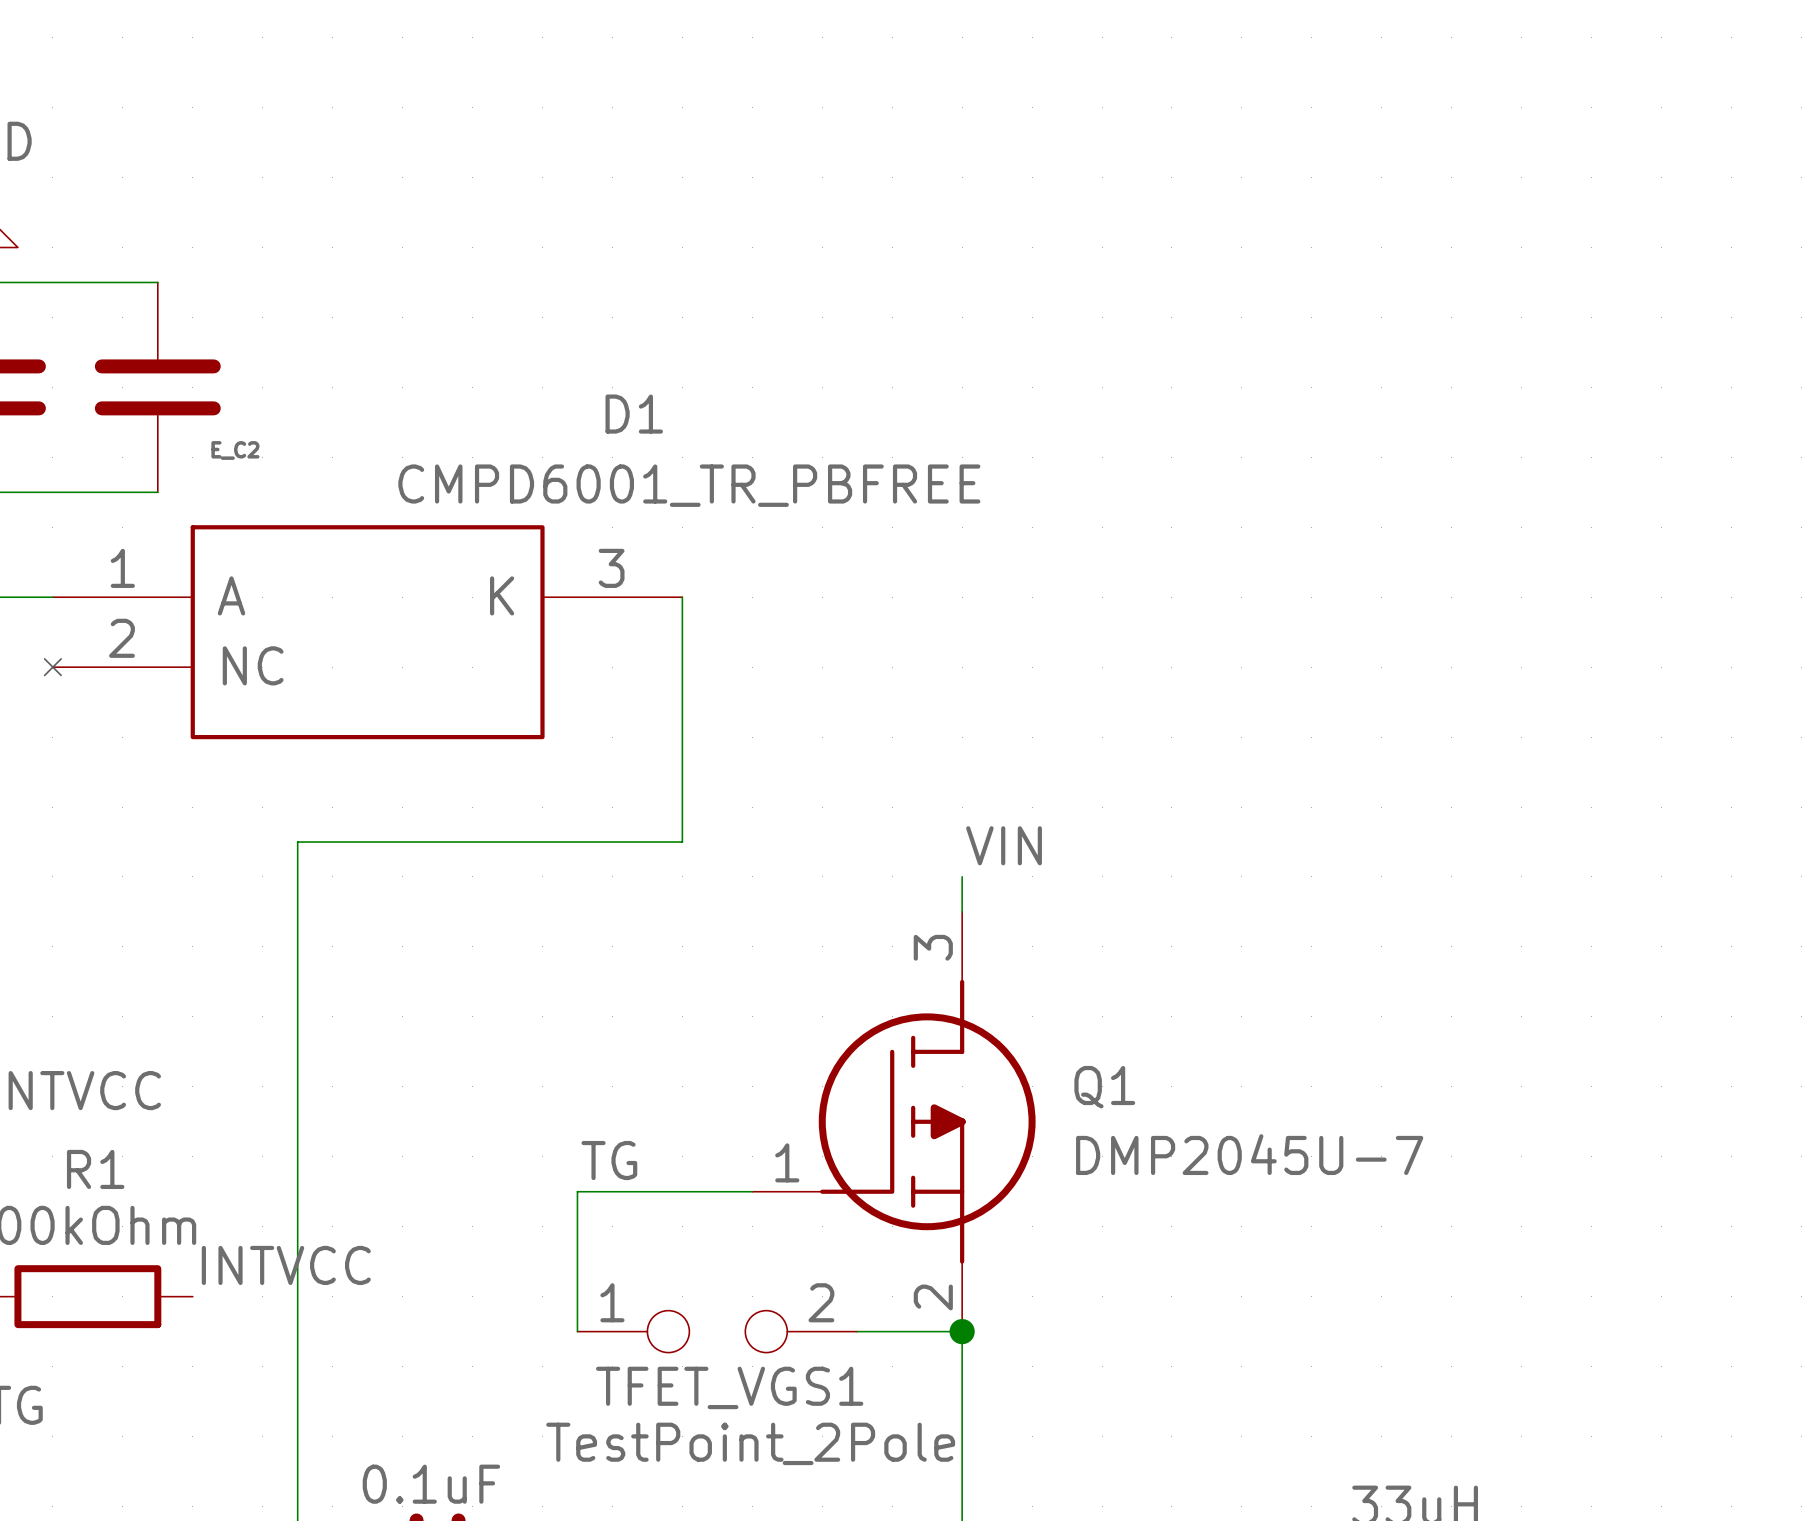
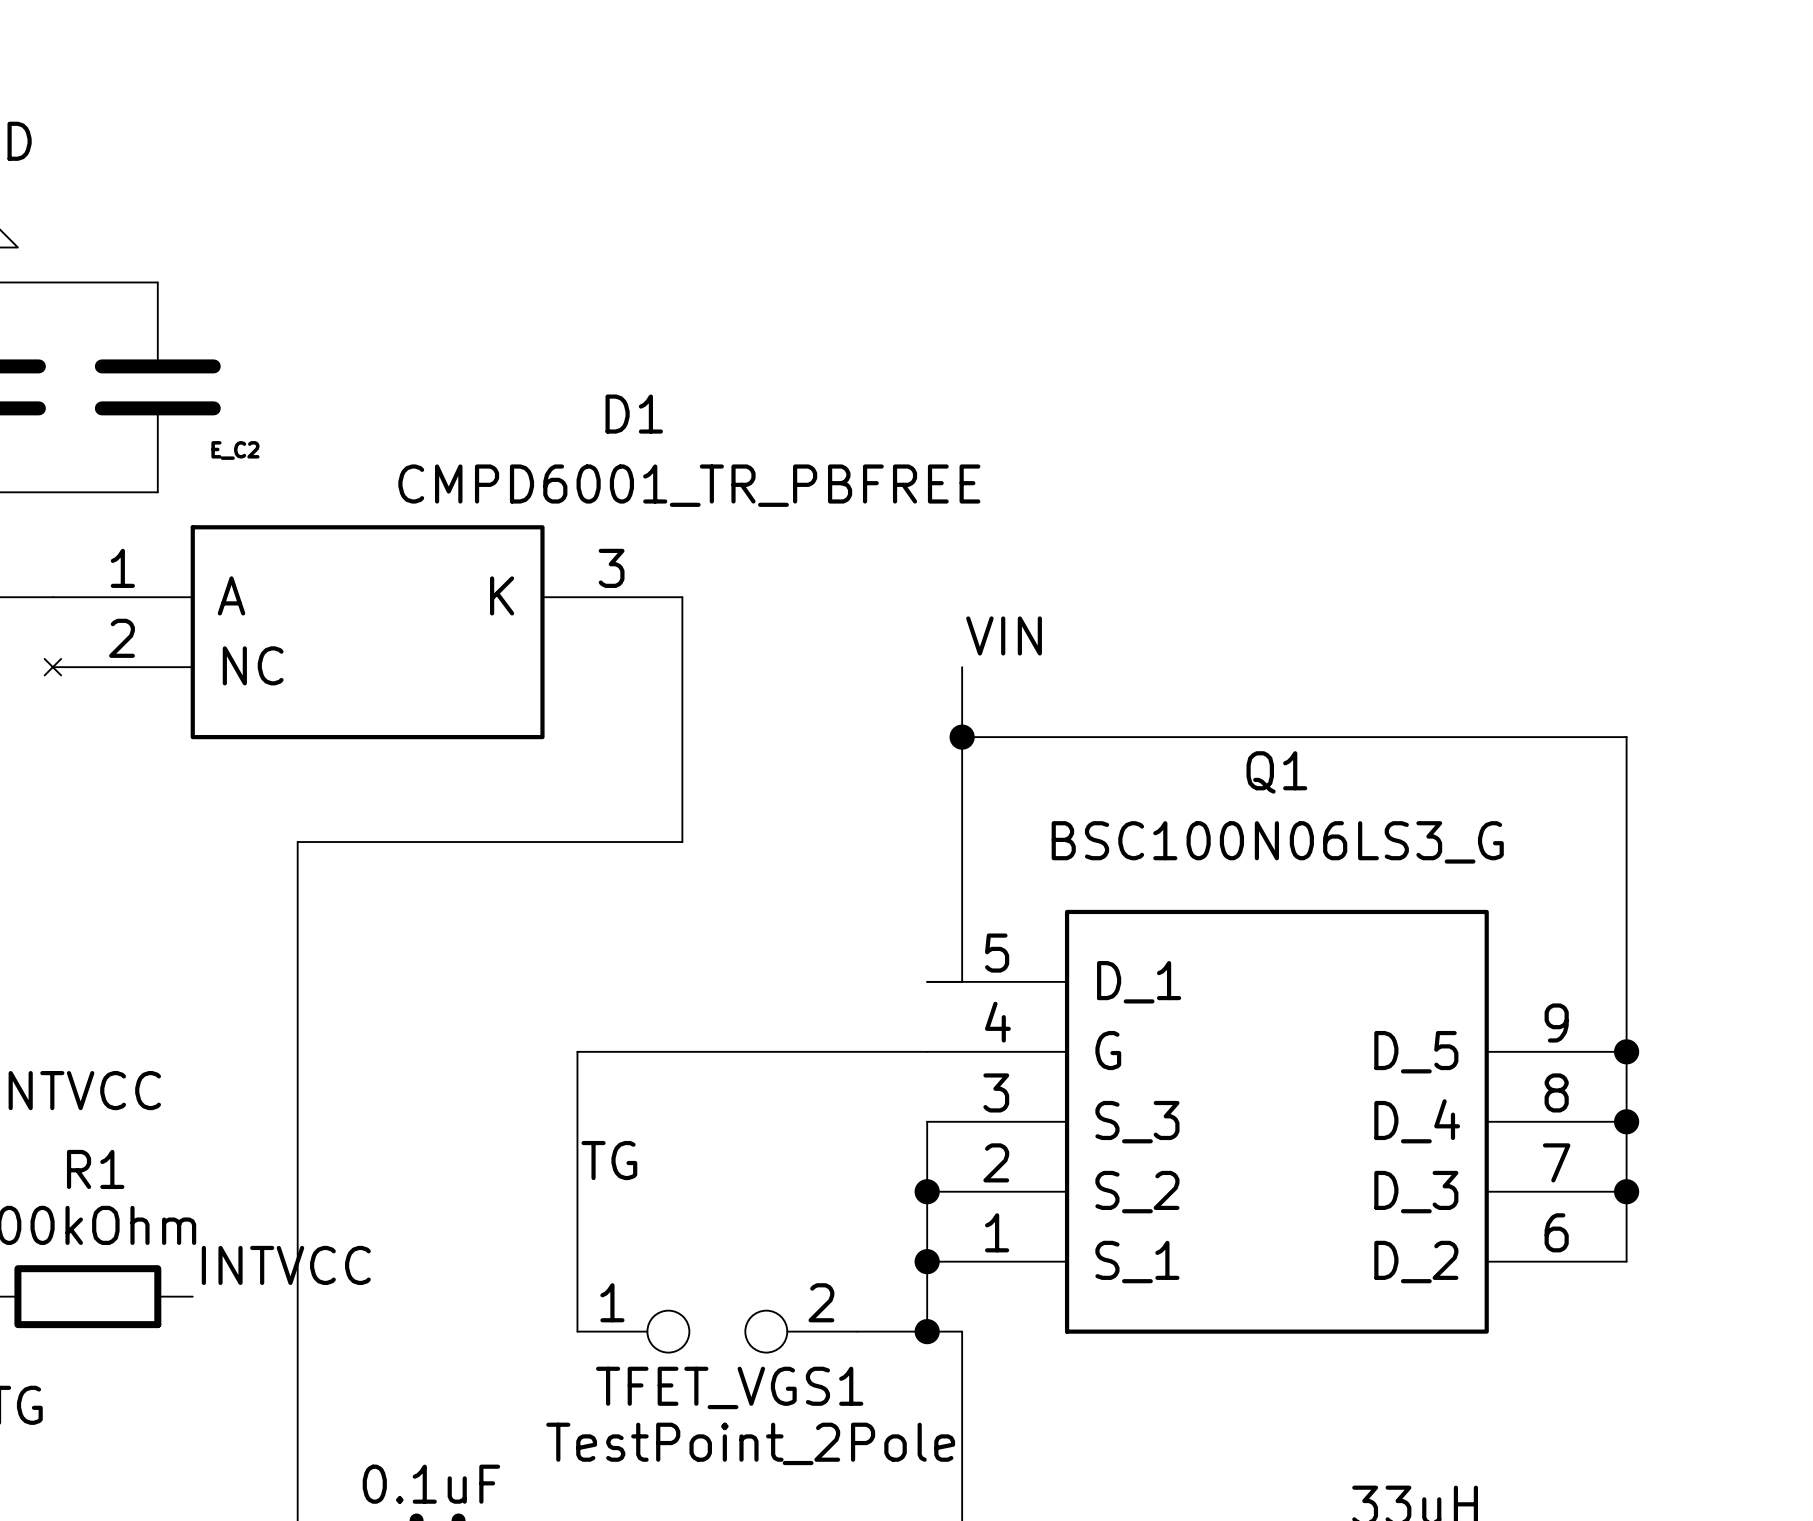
wire: none -> (962, 667) (962, 876)
wire: none -> (962, 737) (1626, 737) (1626, 1261)
junction: none -> (962, 737)
label position: VIN (1004, 845) -> VIN (1004, 635)
Q1 symbol: [752, 911, 1036, 1332] -> [927, 909, 1627, 1334]
junction: none -> (1626, 1051)
Q1 name position: Q1 (1104, 1087) -> Q1 (1276, 772)
wire: none -> (927, 1121) (927, 1331)
junction: none -> (1626, 1121)
Q1 value: DMP2045U-7 (1249, 1154) -> BSC100N06LS3_G (1277, 842)
wire: (577, 1191) (752, 1191) -> (577, 1191) (577, 1051) (927, 1051)
junction: none -> (927, 1191)
junction: none -> (1626, 1191)
junction: none -> (927, 1261)
junction position: (962, 1331) -> (927, 1331)

